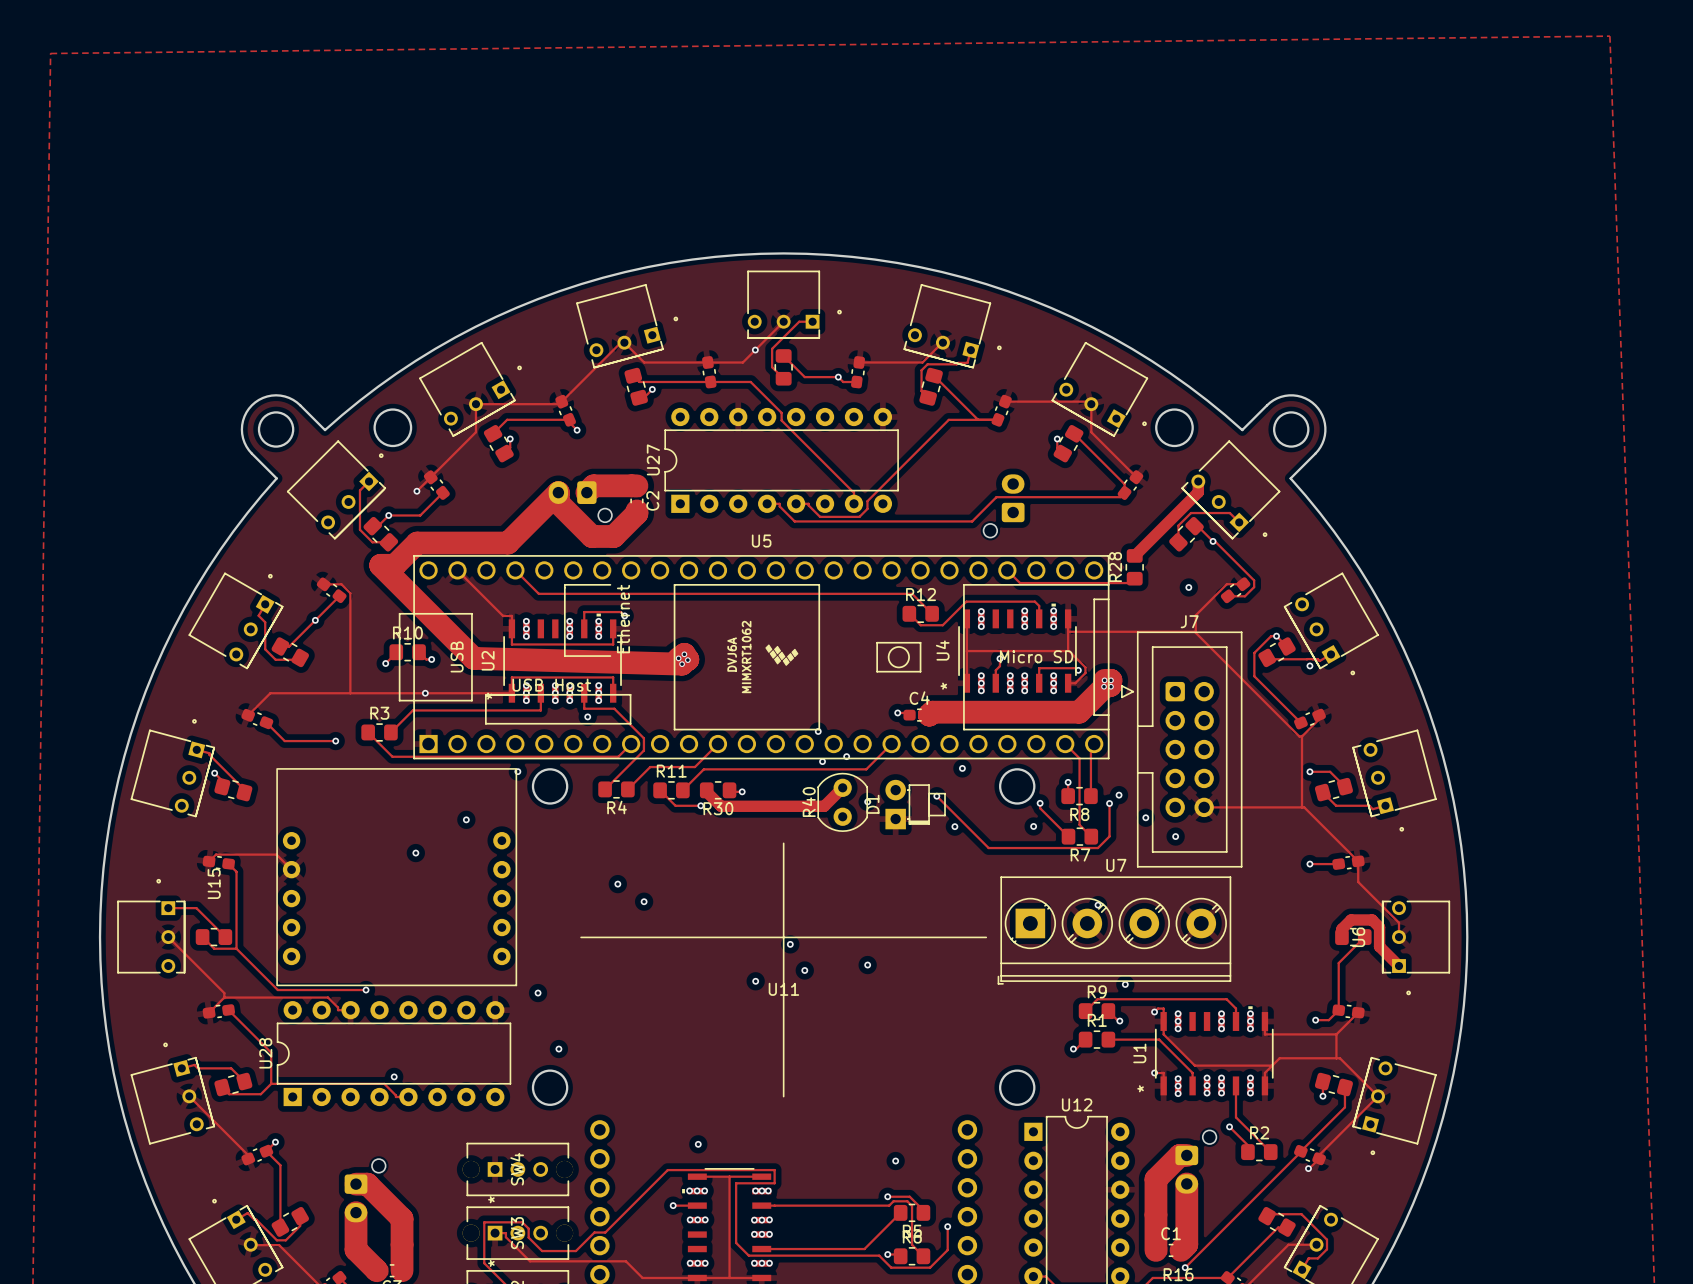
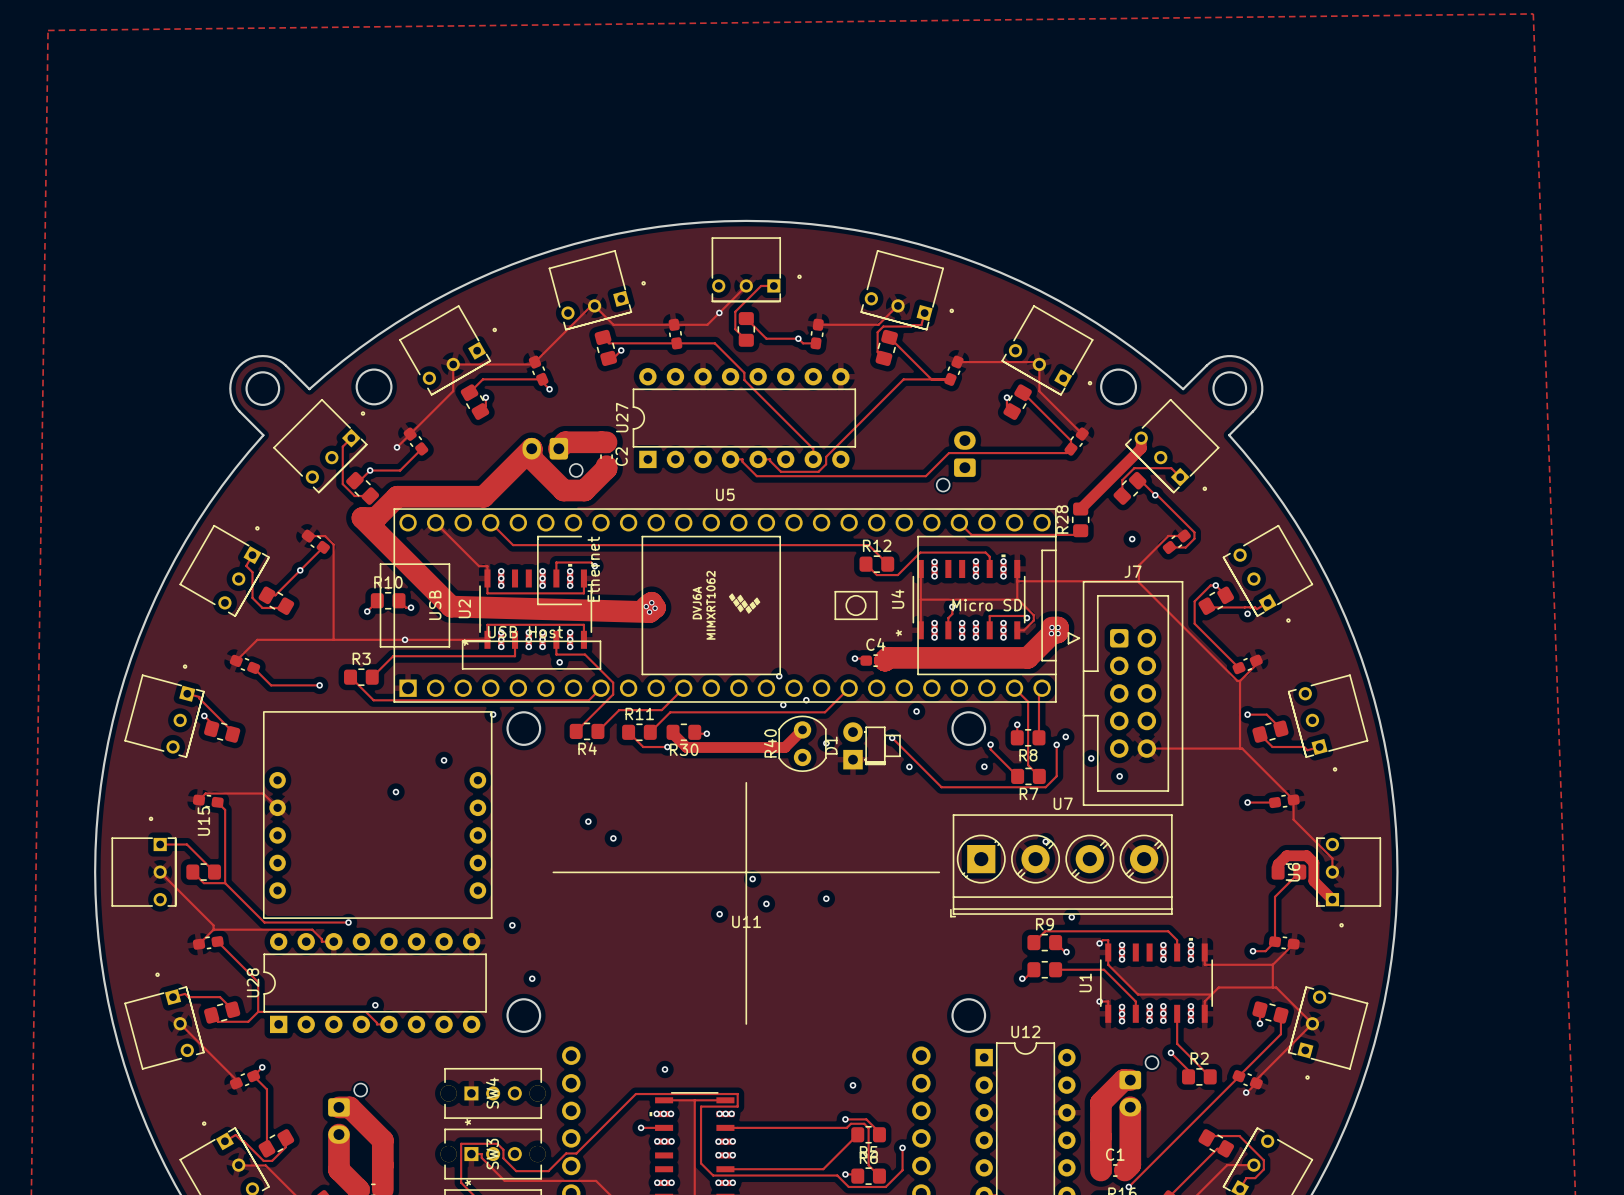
R1 name: R1 (1097, 1020) -> none
U1 text: * (1140, 1088) -> none

